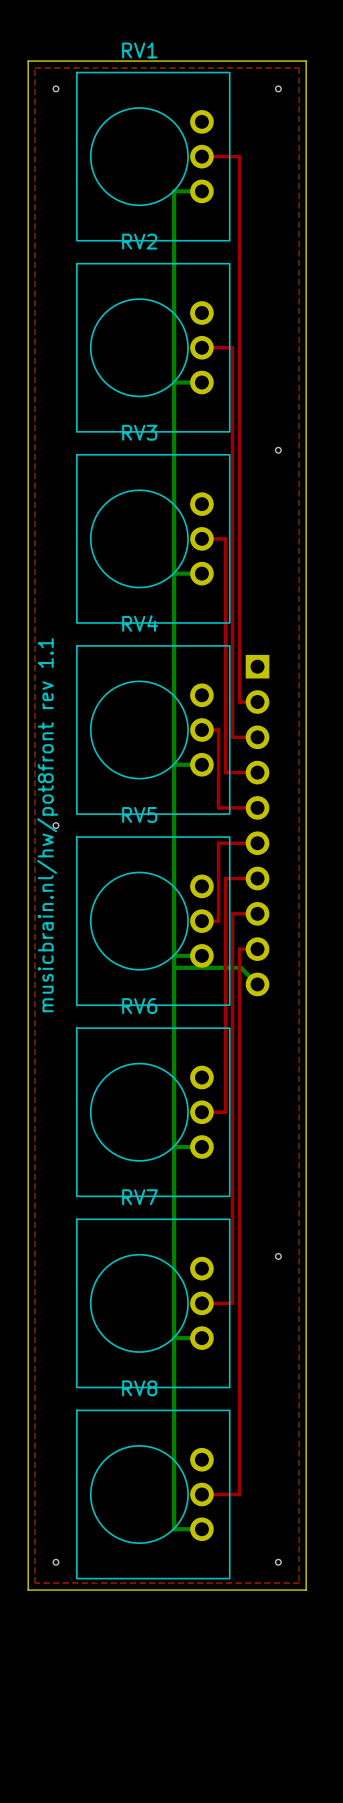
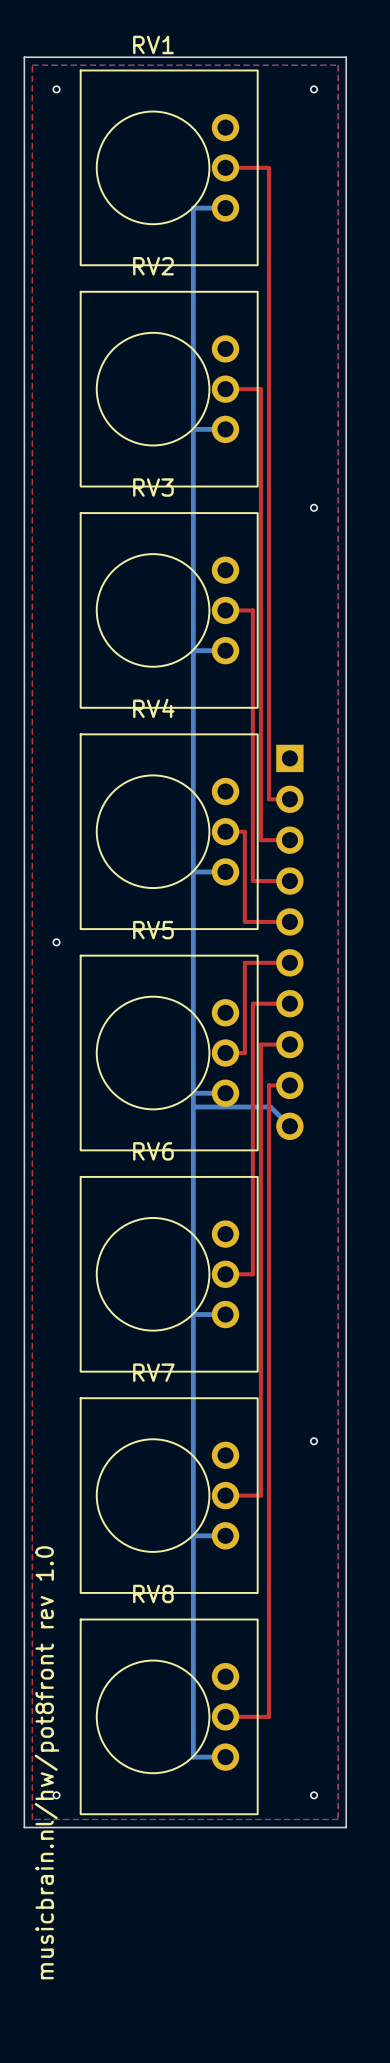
text: musicbrain.nl/hw/pot8front rev 1.1 (47, 825) -> none
text: none -> musicbrain.nl/hw/pot8front rev 1.0 (46, 1762)

